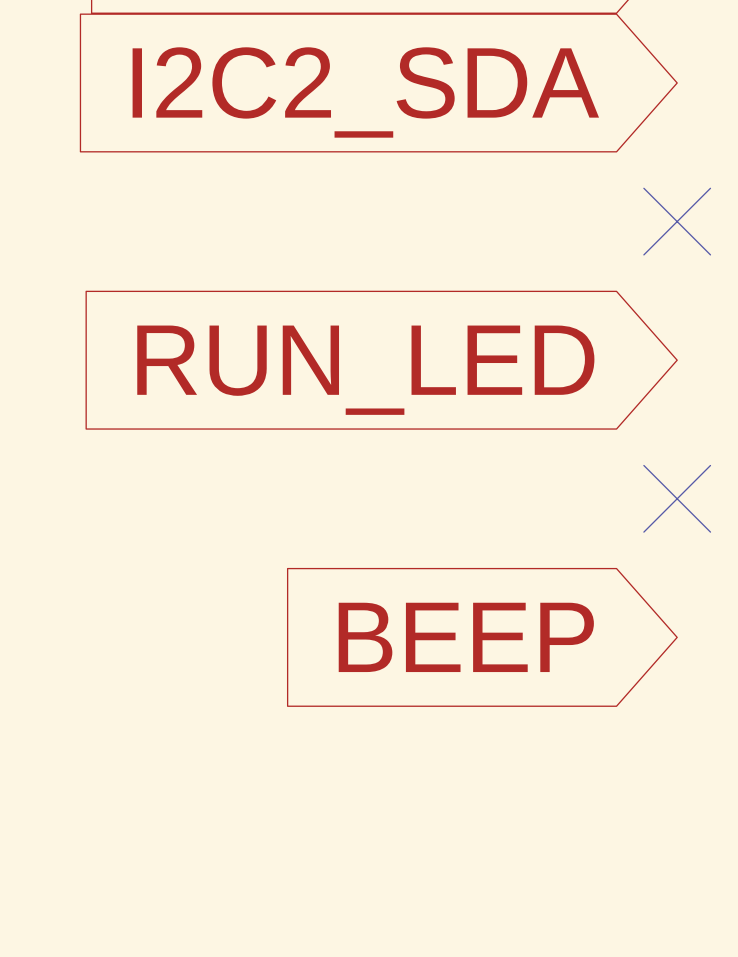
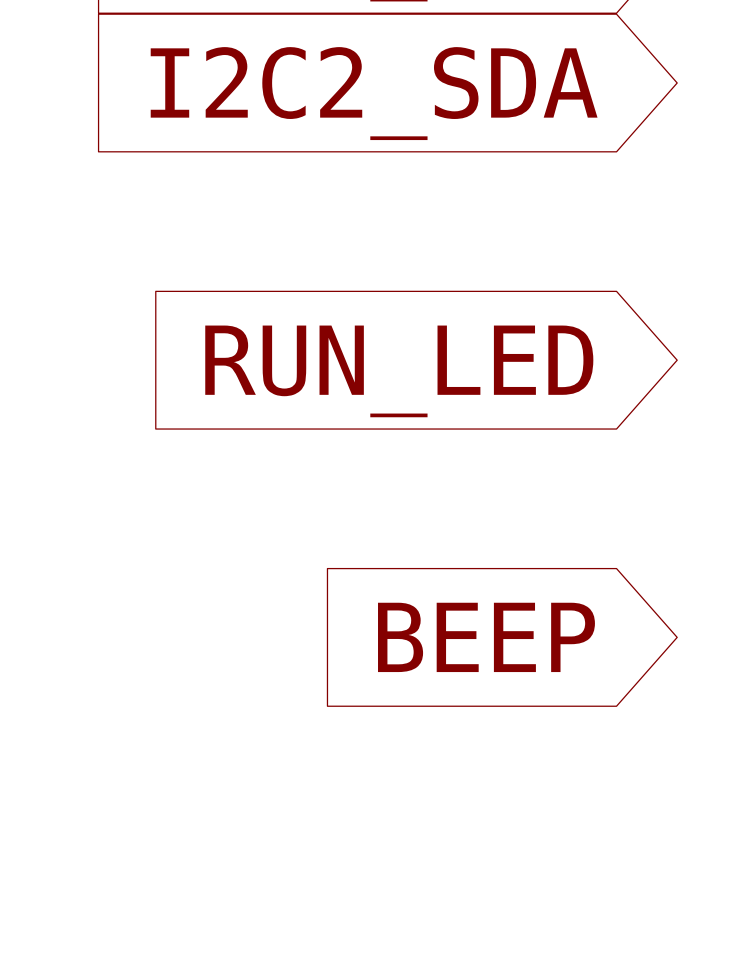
no-connect mark: (677, 221) -> none
no-connect mark: (677, 498) -> none

